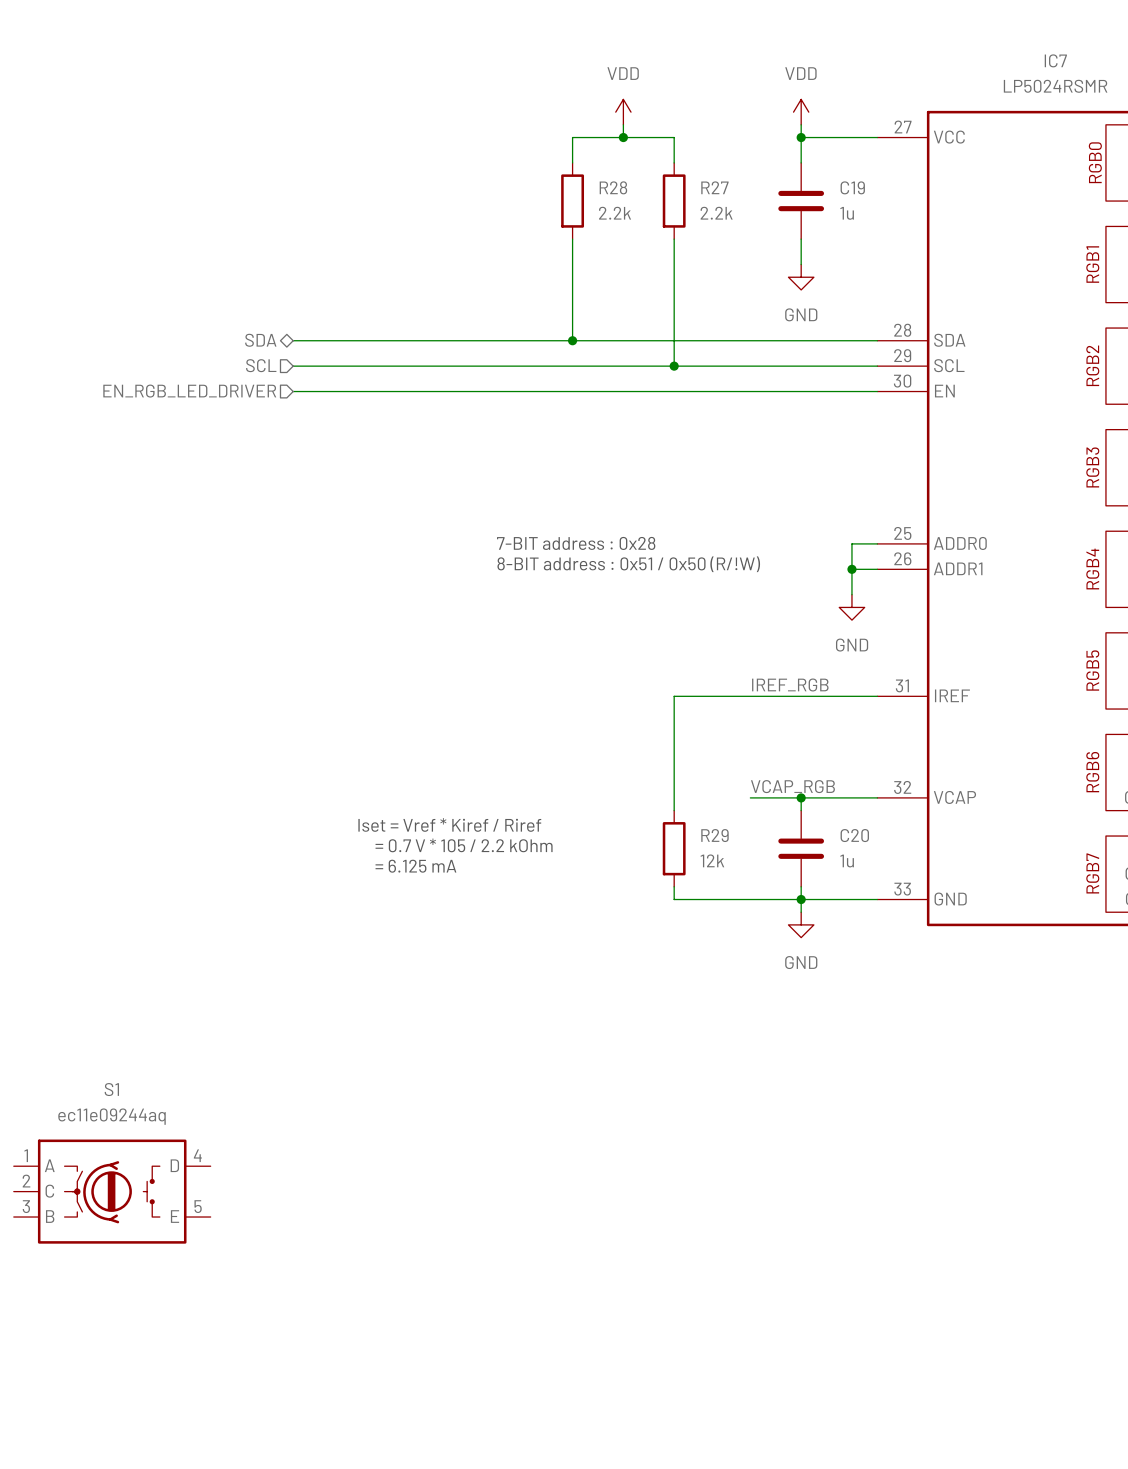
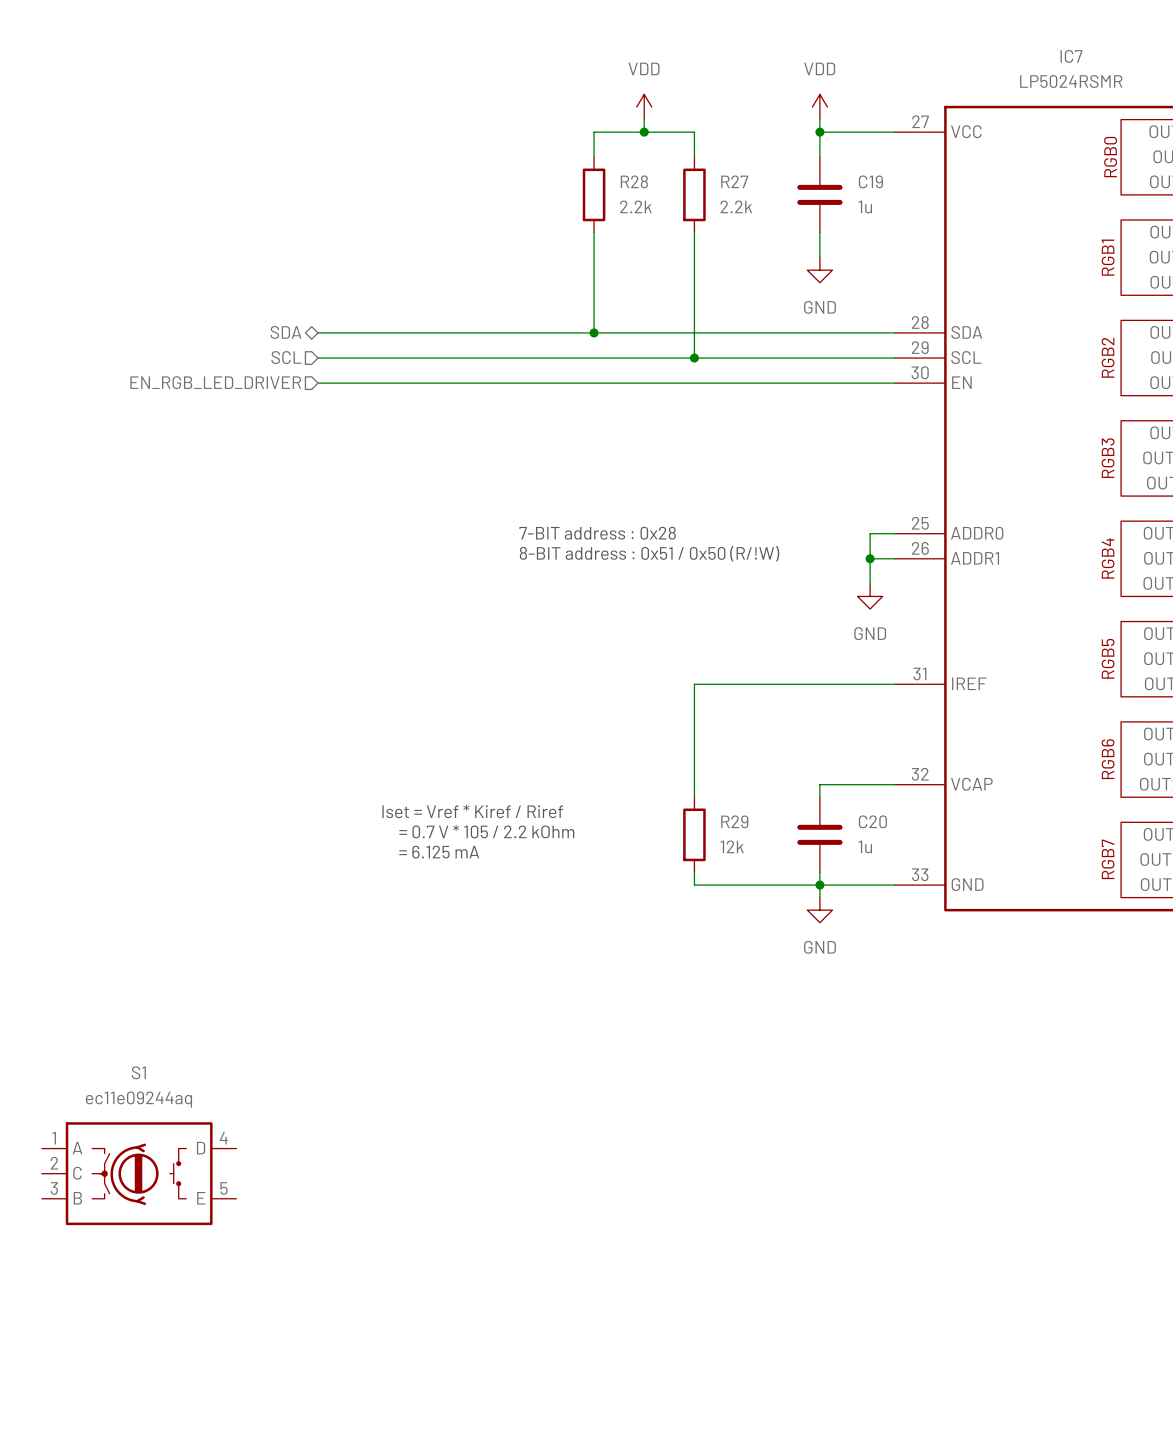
label: IREF_RGB (790, 684) -> none
label: VCAP_RGB (792, 786) -> none
wire: (750, 797) (801, 797) -> none
junction: (801, 797) -> none

